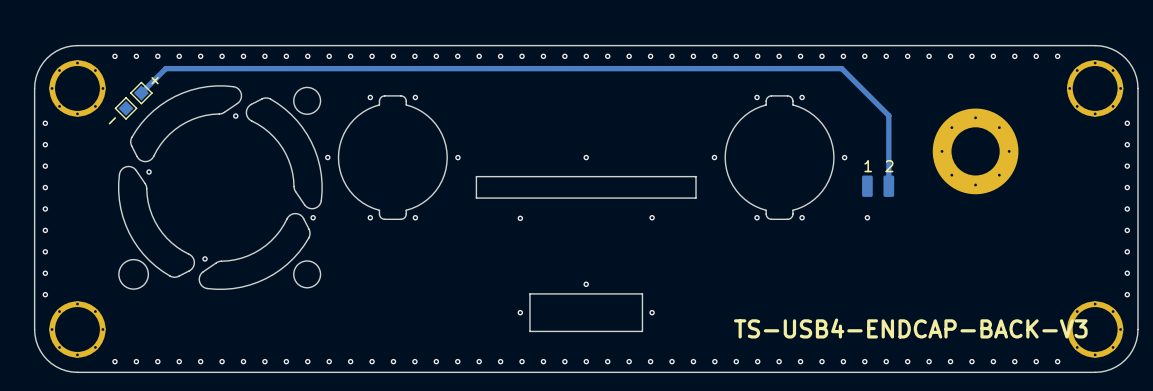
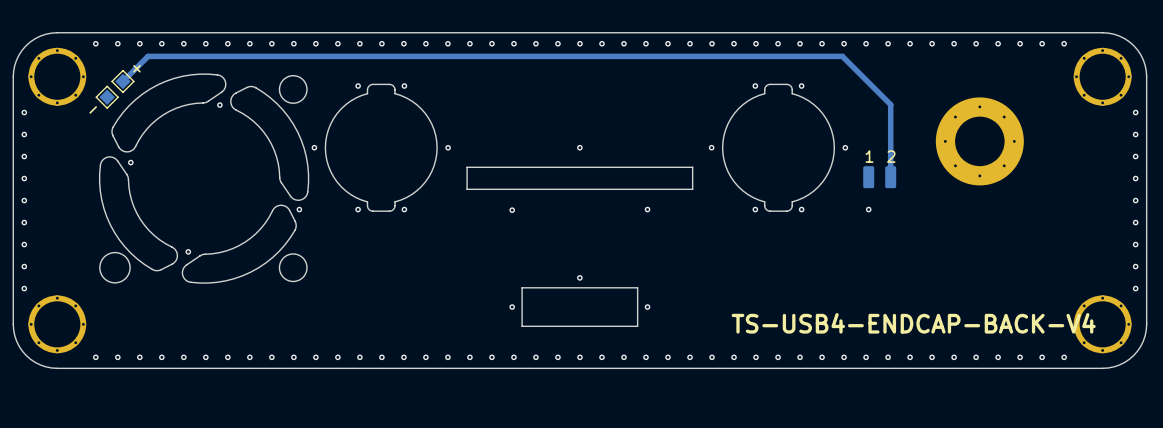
text: TS-USB4-ENDCAP-BACK-V3 (910, 328) -> TS-USB4-ENDCAP-BACK-V4 (913, 323)

